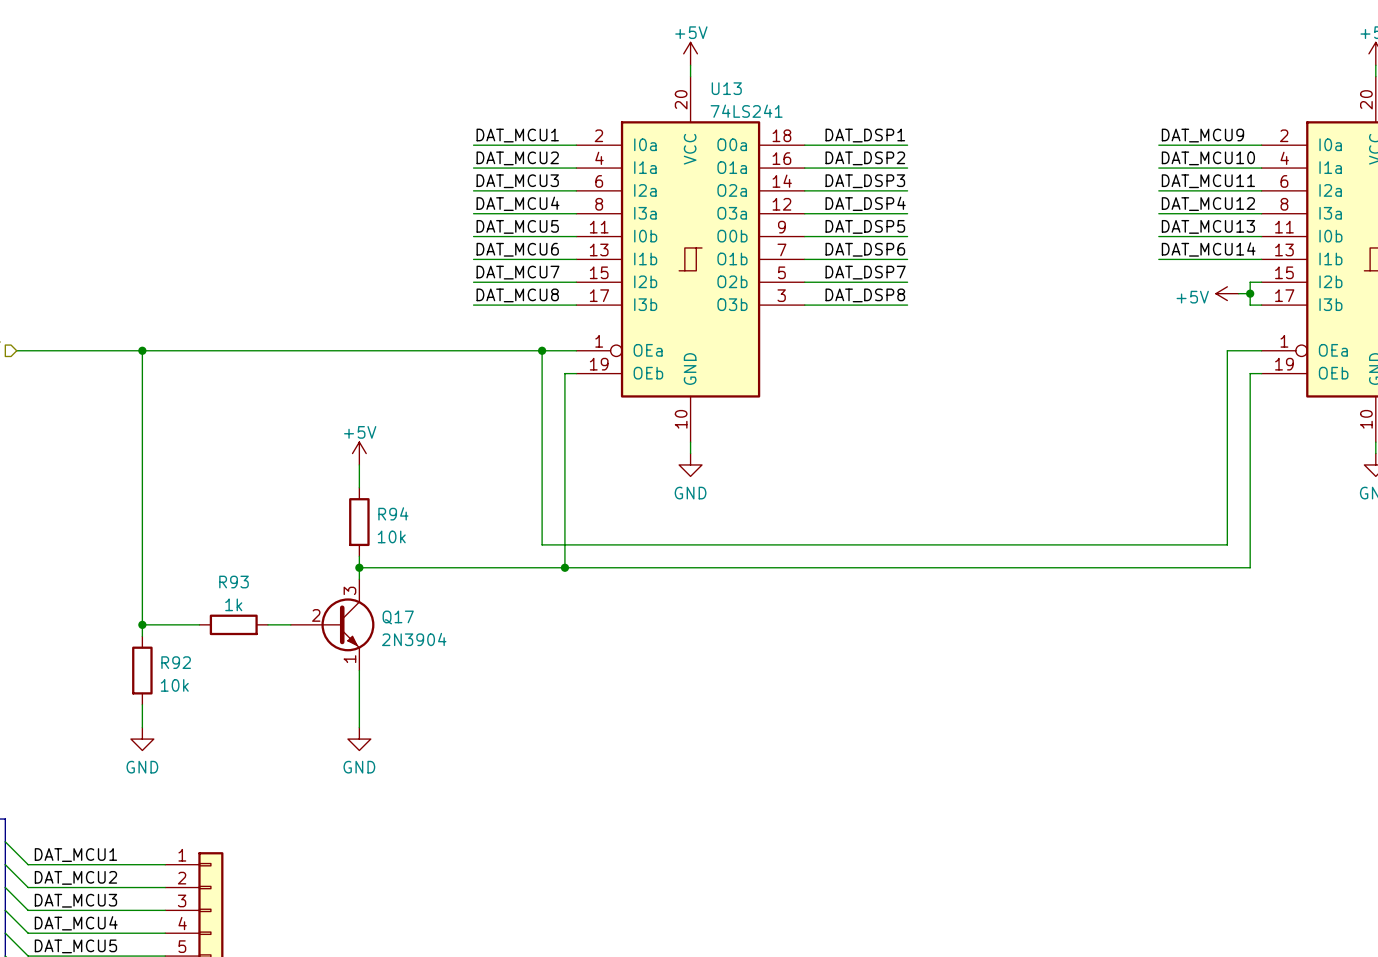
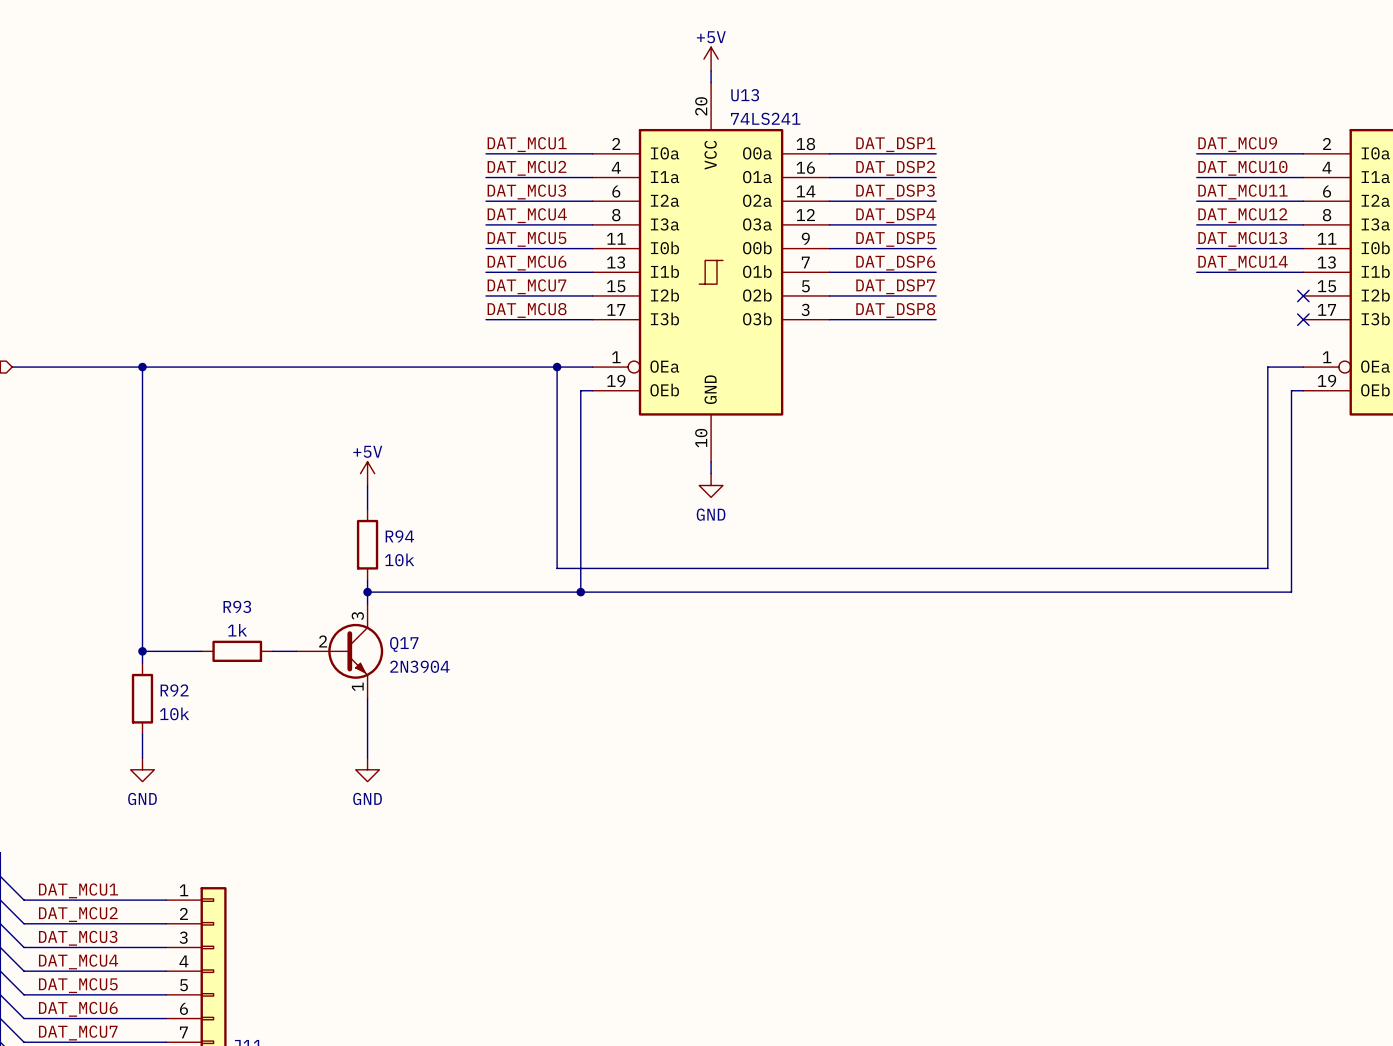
wire: (1261, 282) (1250, 282) (1250, 305) (1261, 305) -> none
no-connect mark: none -> (1303, 295)
power symbol: +5V (1227, 293) -> none
wire: (1238, 293) (1250, 293) -> none
junction: (1250, 293) -> none
no-connect mark: none -> (1303, 319)

